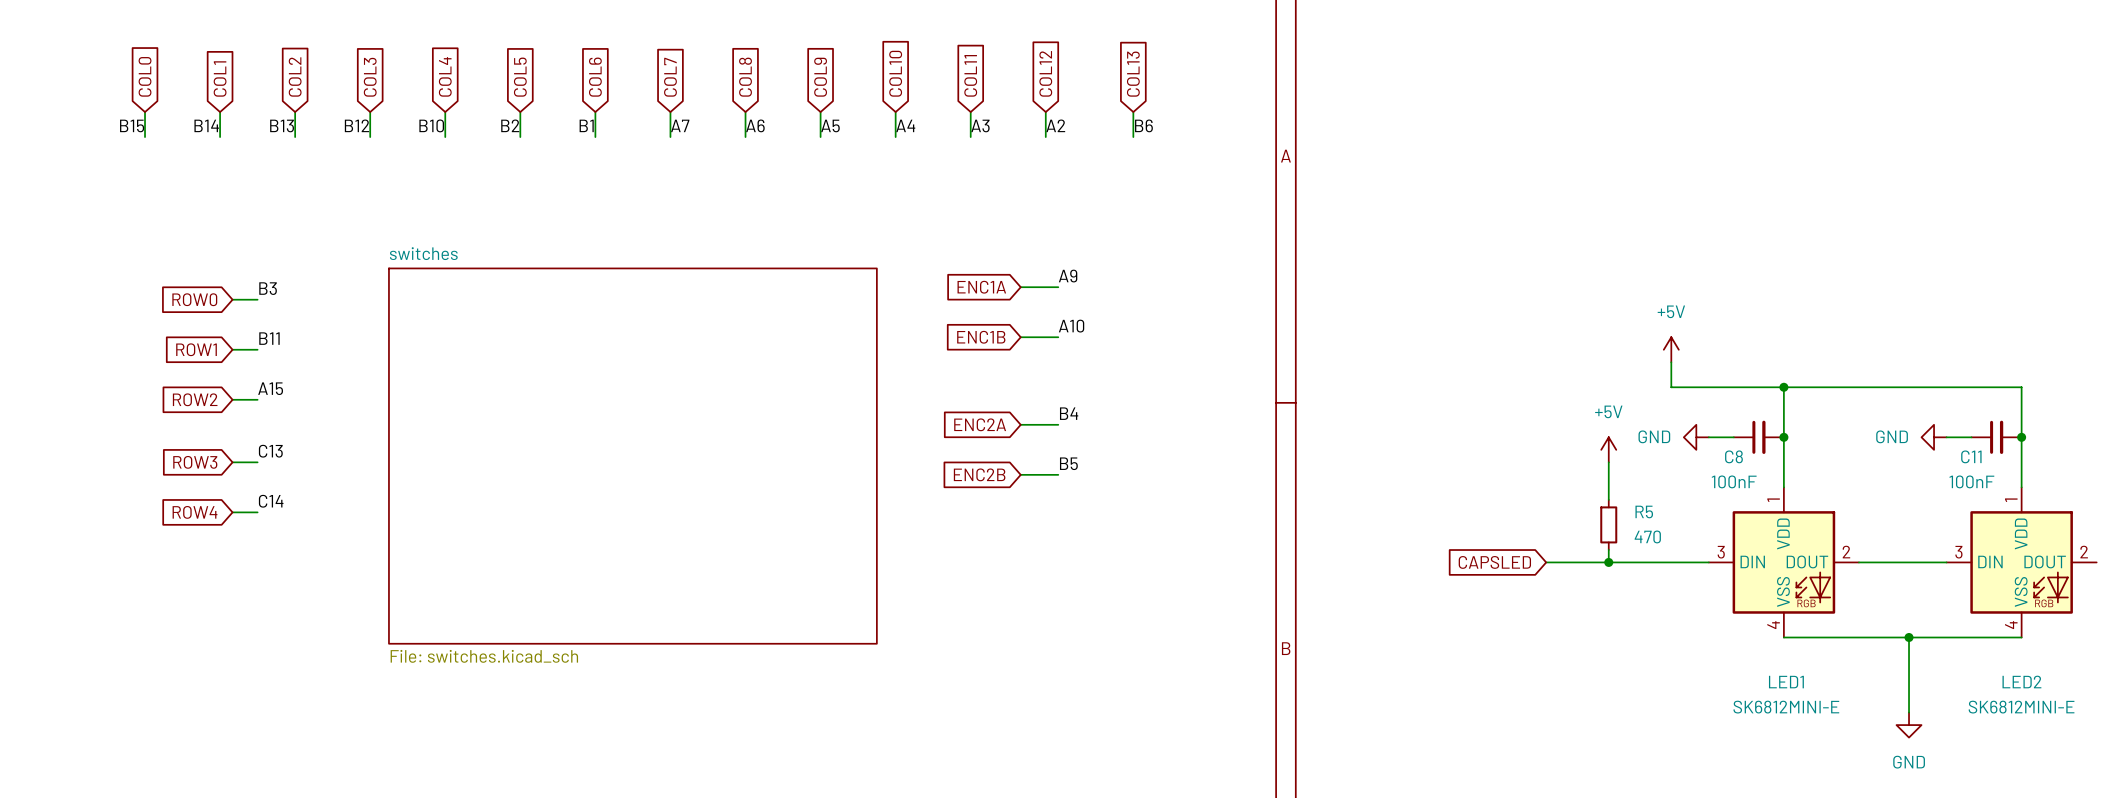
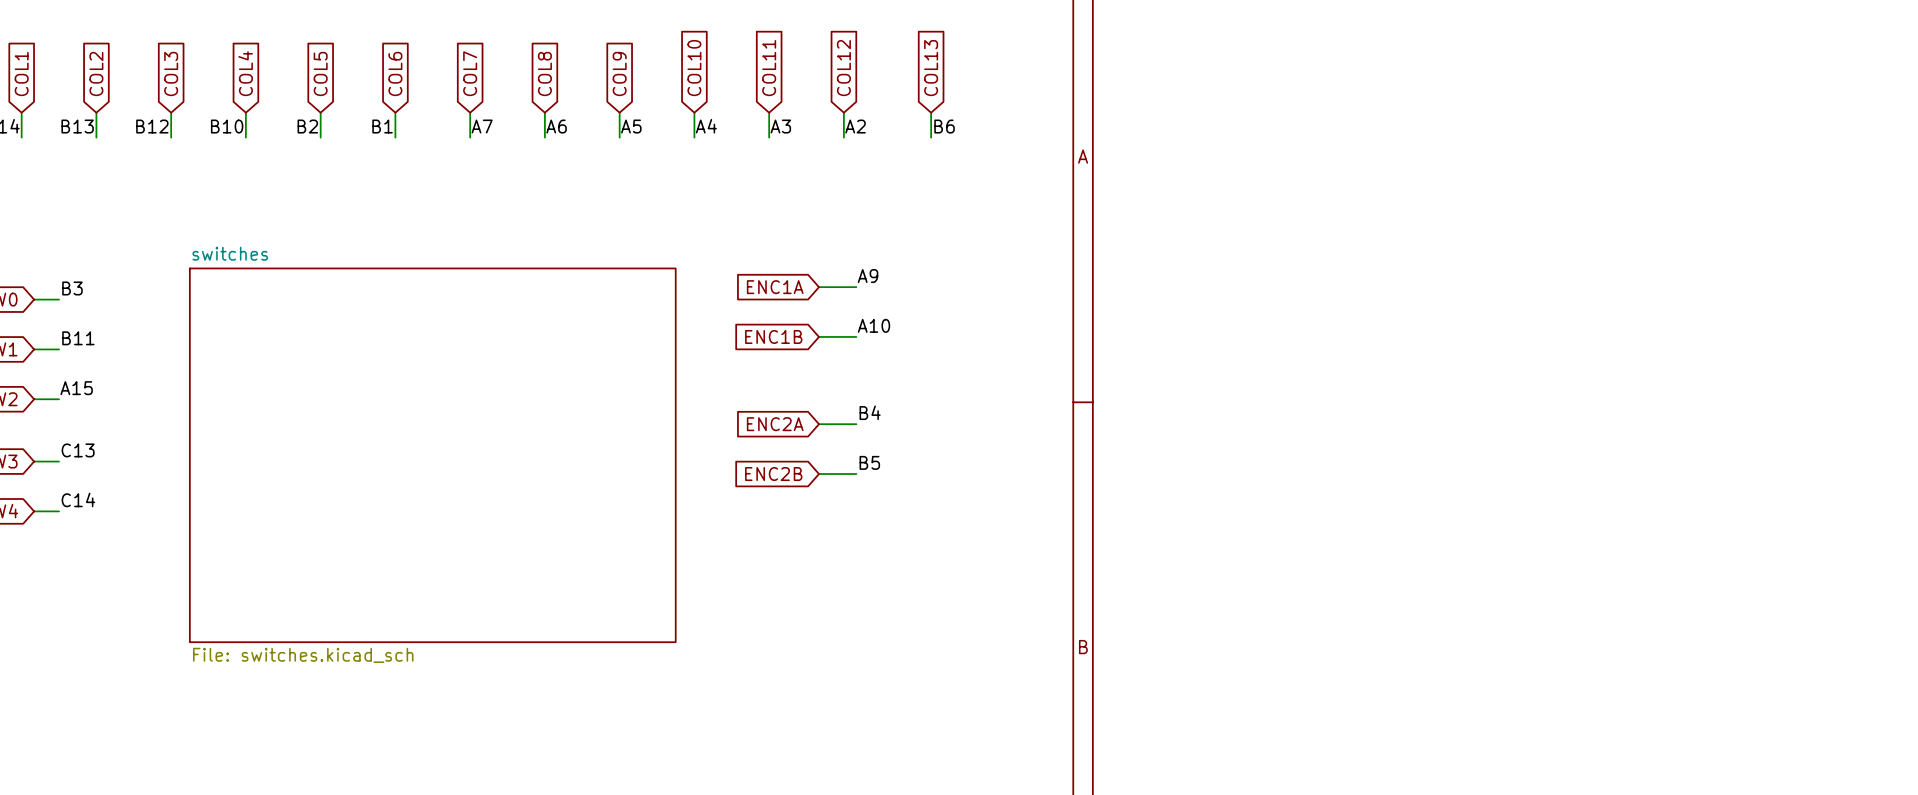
power symbol: +5V (1671, 349) -> none
wire: (1671, 362) (1671, 387) (2021, 387) (2021, 487) -> none
wire: (1783, 387) (1783, 487) -> none
junction: (1783, 387) -> none
power symbol: GND (1696, 437) -> none
wire: (1708, 437) (1733, 437) -> none
C8: 100nF (1758, 437) -> none
junction: (1783, 437) -> none
power symbol: GND (1934, 437) -> none
wire: (1946, 437) (1971, 437) -> none
C11: 100nF (1996, 437) -> none
junction: (2021, 437) -> none
power symbol: +5V (1608, 449) -> none
wire: (1608, 462) (1608, 499) -> none
R5: 470 (1608, 524) -> none
wire: (1608, 549) (1608, 562) -> none
global label: CAPSLED (1494, 562) -> none
wire: (1546, 562) (1708, 562) -> none
junction: (1608, 562) -> none
LED1: SK6812MINI-E (1783, 562) -> none
wire: (1858, 562) (1946, 562) -> none
LED2: SK6812MINI-E (2021, 562) -> none
wire: (1783, 637) (2021, 637) -> none
wire: (1909, 637) (1909, 712) -> none
junction: (1909, 637) -> none
power symbol: GND (1909, 725) -> none

